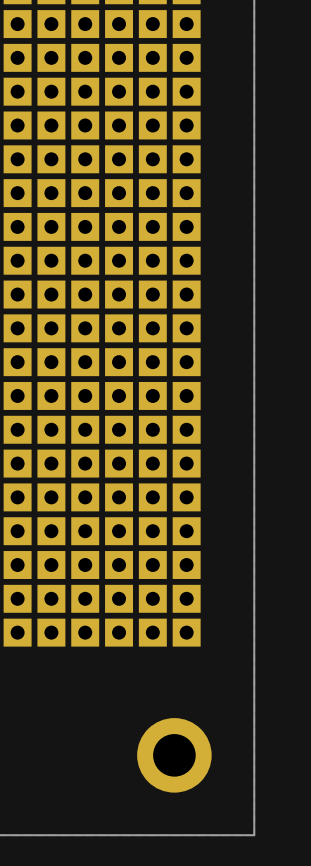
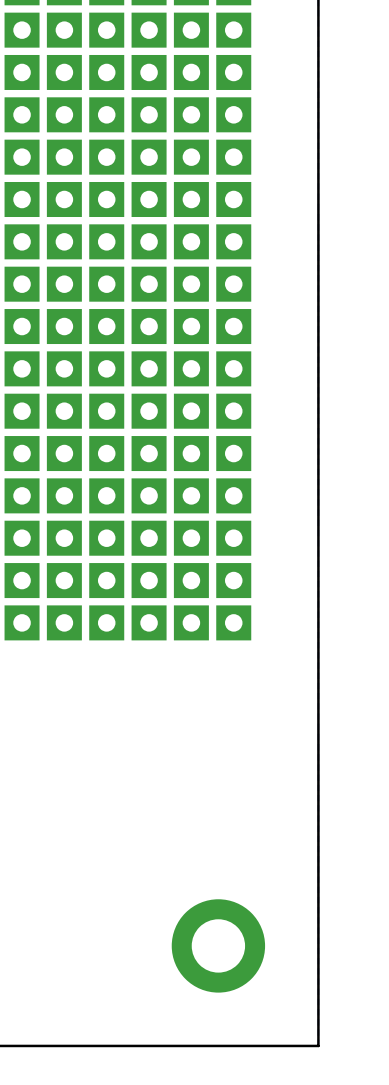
part: (17, 531) -> none
part: (51, 531) -> none
part: (85, 531) -> none
part: (119, 531) -> none
part: (152, 531) -> none
part: (186, 531) -> none
part: (17, 565) -> none
part: (51, 565) -> none
part: (85, 565) -> none
part: (119, 565) -> none
part: (152, 565) -> none
part: (186, 565) -> none
part: (17, 598) -> none
part: (51, 598) -> none
part: (85, 598) -> none
part: (119, 598) -> none
part: (152, 598) -> none
part: (186, 598) -> none
part: (17, 632) -> none
part: (51, 632) -> none
part: (85, 632) -> none
part: (119, 632) -> none
part: (152, 632) -> none
part: (186, 632) -> none

